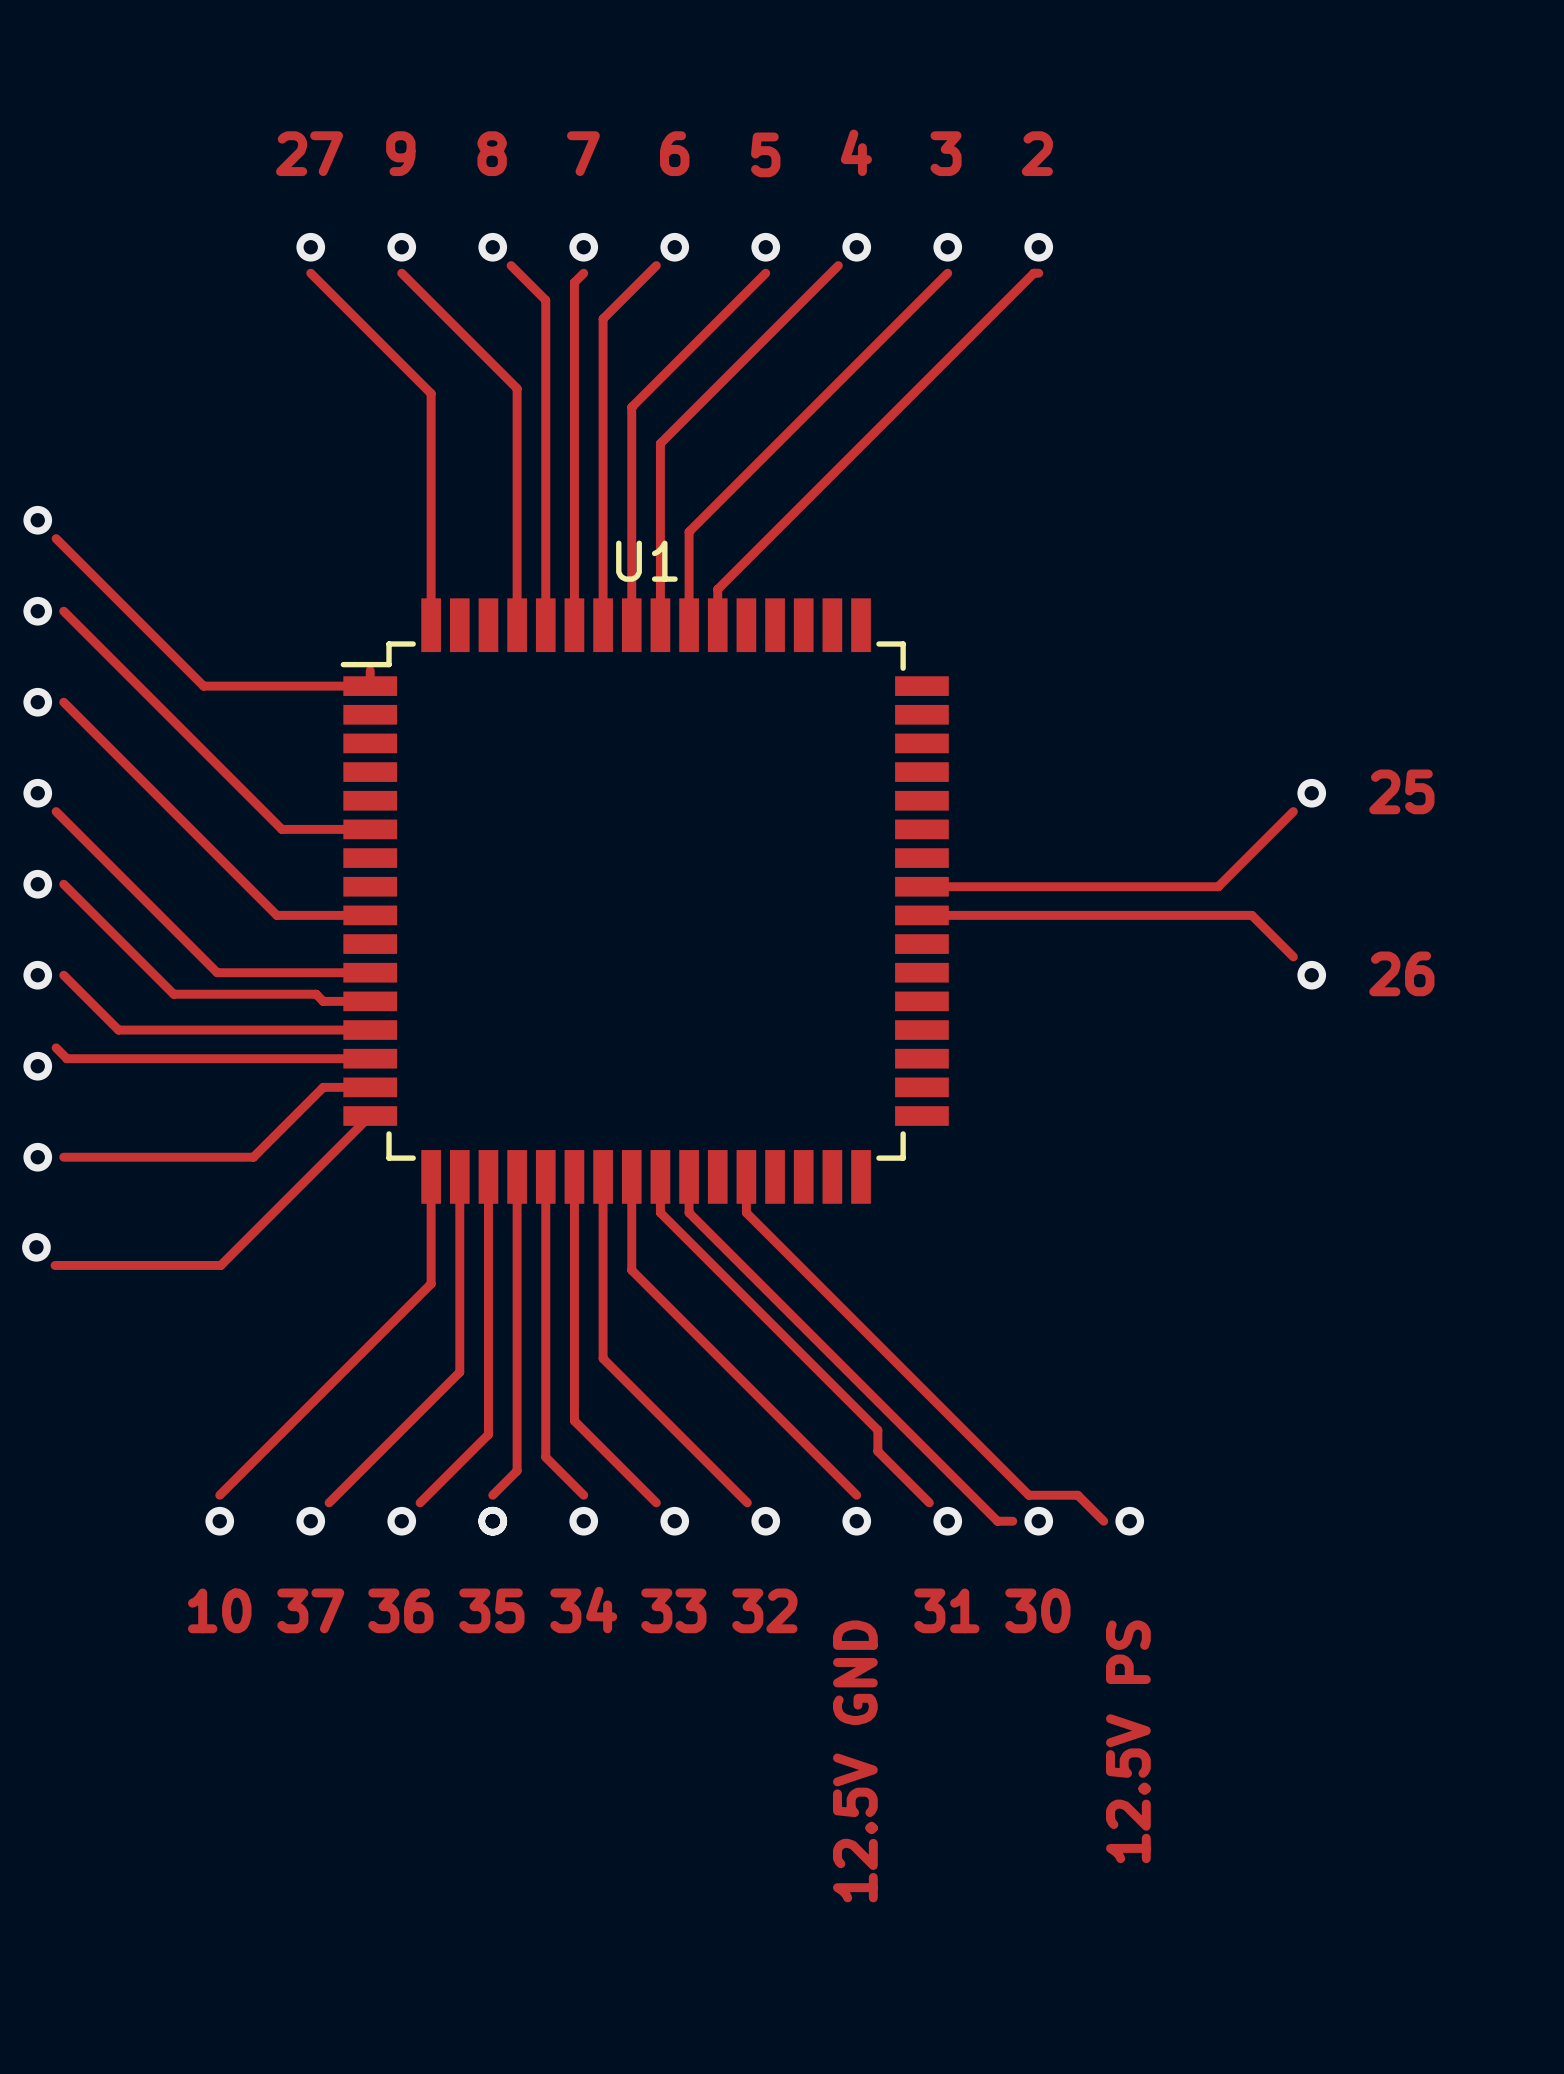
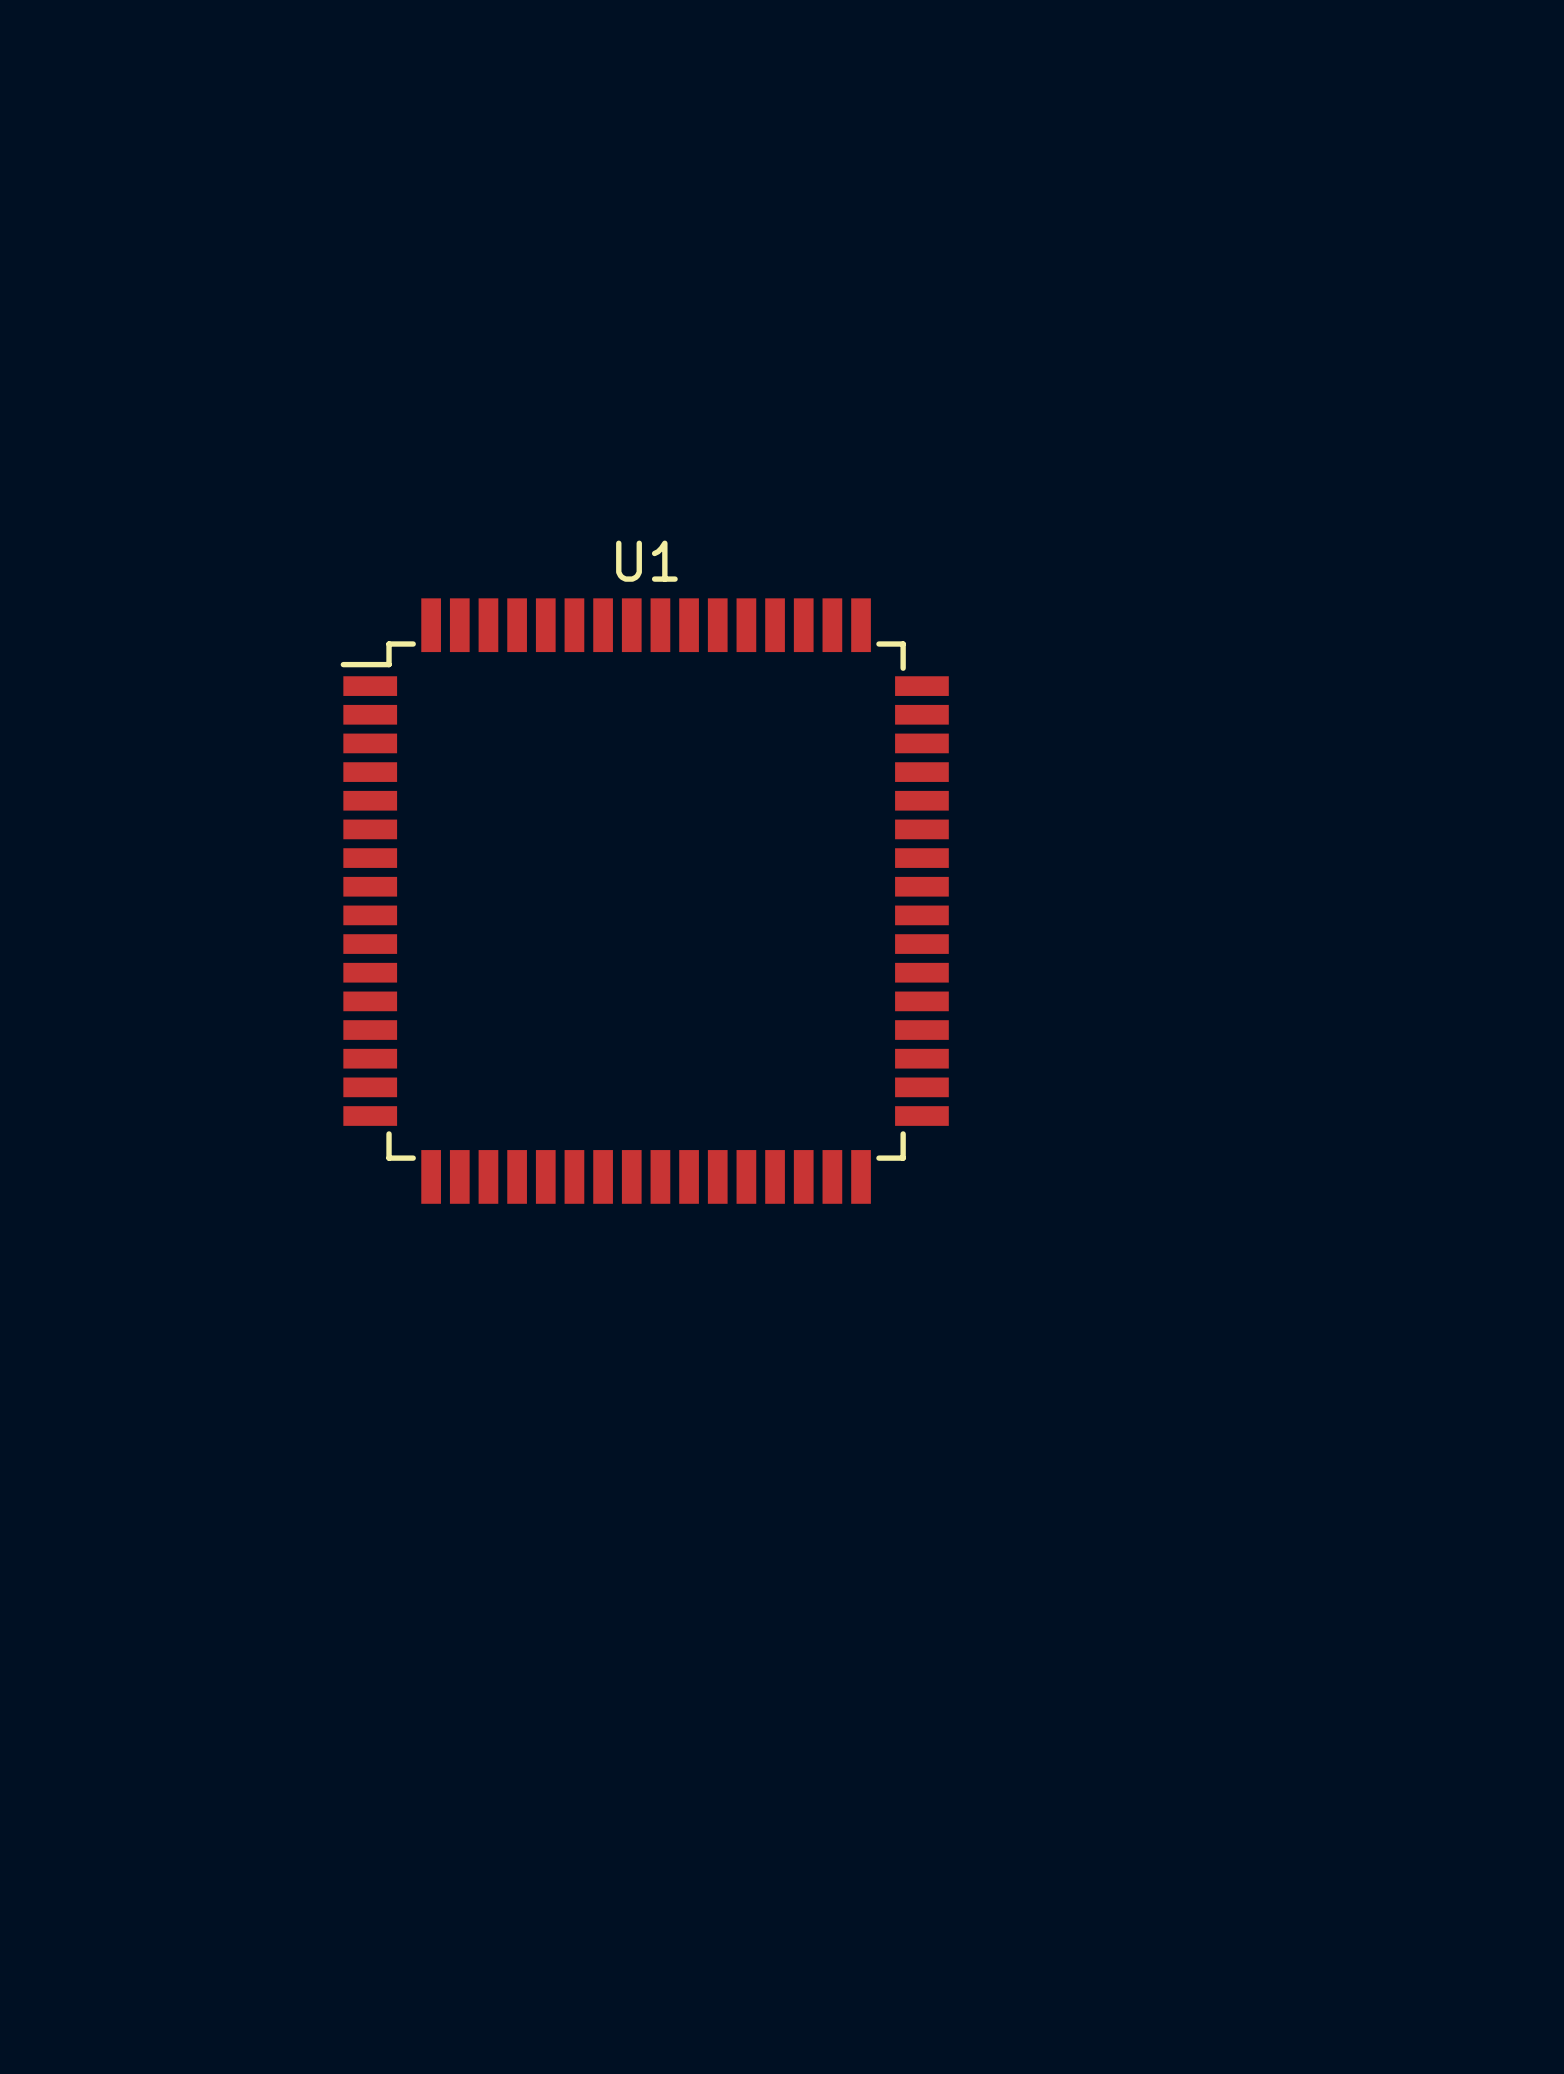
text: 4 (856, 152) -> none
text: 27 (309, 153) -> none
text: 9 (400, 153) -> none
text: 8 (492, 153) -> none
text: 7 (583, 153) -> none
text: 6 (674, 153) -> none
text: 3 (946, 153) -> none
text: 2 (1037, 153) -> none
text: 5 (765, 154) -> none
via: (310, 247) -> none
via: (401, 247) -> none
via: (492, 247) -> none
via: (583, 247) -> none
via: (674, 247) -> none
via: (765, 247) -> none
via: (856, 247) -> none
via: (947, 247) -> none
via: (1038, 247) -> none
track: (511, 265) (545, 300) (545, 625) -> none
track: (656, 265) (603, 318) (603, 625) -> none
track: (838, 265) (660, 443) (660, 625) -> none
track: (310, 273) (431, 393) (431, 625) -> none
track: (401, 273) (517, 388) (517, 625) -> none
track: (583, 273) (574, 282) (574, 625) -> none
track: (765, 273) (631, 407) (631, 625) -> none
track: (947, 273) (689, 531) (689, 625) -> none
track: (1038, 273) (1033, 273) (717, 589) (717, 625) -> none
via: (37, 520) -> none
track: (56, 538) (203, 686) (370, 686) (370, 670) -> none
via: (37, 611) -> none
track: (63, 611) (281, 829) (370, 829) -> none
via: (37, 702) -> none
track: (63, 702) (276, 915) (370, 915) -> none
text: 25 (1401, 791) -> none
via: (37, 793) -> none
via: (1311, 793) -> none
track: (56, 811) (217, 972) (370, 972) -> none
track: (1293, 811) (1218, 886) (921, 886) -> none
via: (37, 884) -> none
track: (63, 884) (173, 994) (316, 994) (323, 1001) (370, 1001) -> none
track: (921, 915) (1251, 915) (1293, 956) -> none
text: 26 (1401, 973) -> none
via: (37, 975) -> none
track: (63, 975) (118, 1030) (370, 1030) -> none
via: (1311, 975) -> none
track: (56, 1047) (66, 1058) (370, 1058) -> none
via: (37, 1066) -> none
track: (370, 1087) (323, 1087) (253, 1157) (63, 1157) -> none
track: (370, 1116) (220, 1265) (55, 1265) -> none
via: (37, 1157) -> none
track: (431, 1176) (431, 1283) (219, 1495) -> none
track: (459, 1176) (459, 1372) (329, 1502) -> none
track: (488, 1176) (488, 1434) (420, 1502) -> none
track: (517, 1176) (517, 1470) (492, 1495) -> none
track: (545, 1176) (545, 1457) (583, 1495) -> none
track: (574, 1176) (574, 1420) (656, 1502) -> none
track: (603, 1176) (603, 1358) (747, 1502) -> none
track: (631, 1176) (631, 1270) (856, 1495) -> none
track: (660, 1176) (660, 1212) (877, 1430) (877, 1451) (929, 1502) -> none
track: (689, 1176) (689, 1212) (997, 1521) (1012, 1521) -> none
track: (746, 1176) (746, 1212) (1028, 1495) (1077, 1495) (1103, 1521) -> none
via: (36, 1247) -> none
via: (219, 1521) -> none
via: (310, 1521) -> none
via: (401, 1521) -> none
via: (492, 1521) -> none
via: (583, 1521) -> none
via: (674, 1521) -> none
via: (765, 1521) -> none
via: (856, 1521) -> none
via: (947, 1521) -> none
via: (1038, 1521) -> none
via: (1129, 1521) -> none
text: 10 (219, 1610) -> none
text: 37 (310, 1610) -> none
text: 36 (400, 1610) -> none
text: 35 (491, 1610) -> none
text: 34 (583, 1610) -> none
text: 33 (673, 1610) -> none
text: 32 (764, 1610) -> none
text: 31 (946, 1610) -> none
text: 30 (1037, 1610) -> none
text: 12.5V PS (1128, 1741) -> none
text: 12.5V GND (855, 1761) -> none

